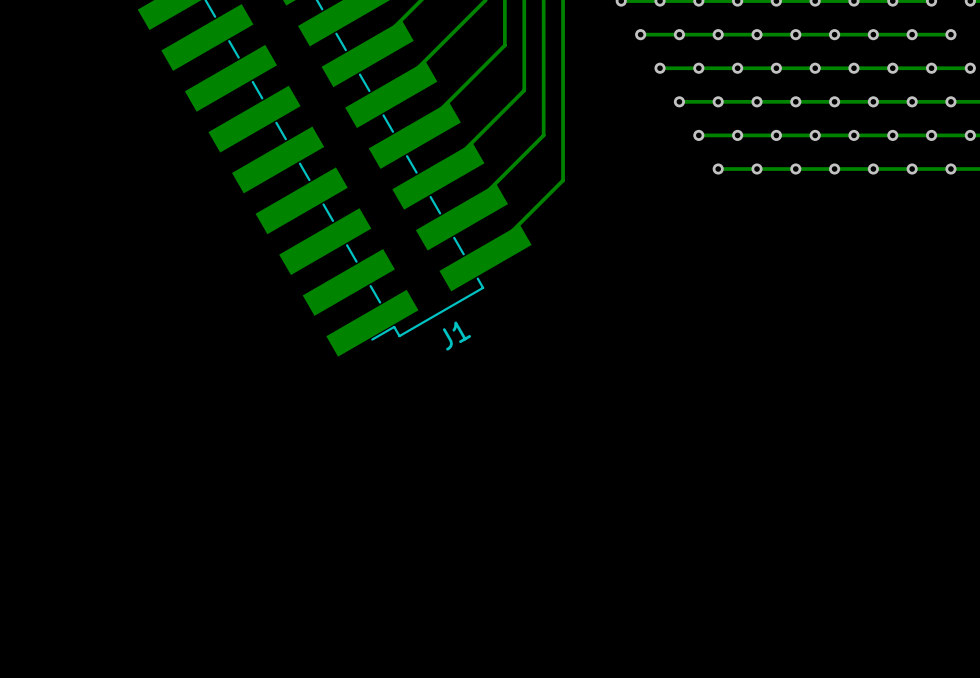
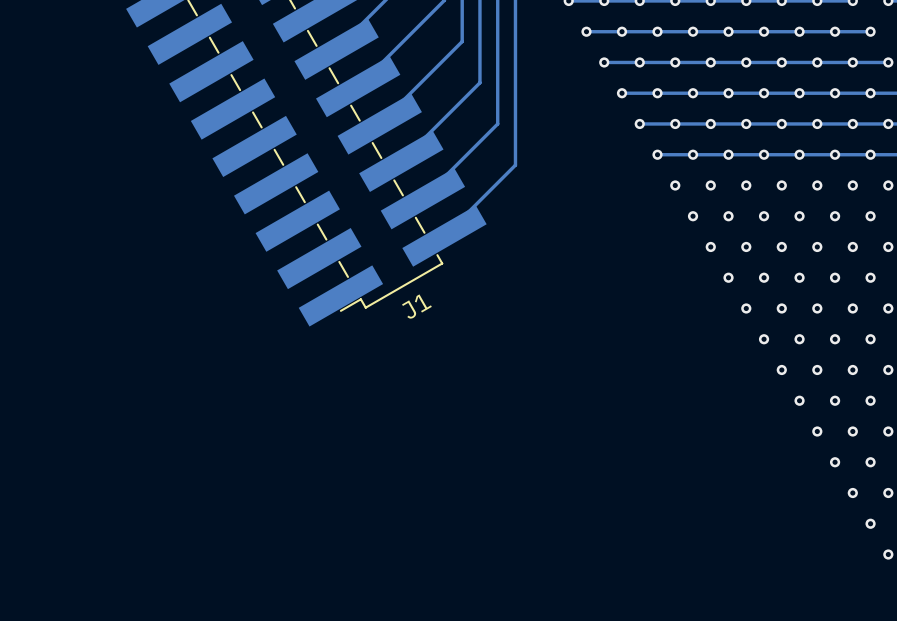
via: none -> (675, 185)
via: none -> (710, 185)
via: none -> (746, 185)
via: none -> (781, 185)
via: none -> (817, 185)
via: none -> (852, 185)
via: none -> (888, 185)
via: none -> (693, 216)
via: none -> (728, 216)
via: none -> (764, 216)
via: none -> (799, 216)
via: none -> (835, 216)
via: none -> (870, 216)
via: none -> (710, 246)
via: none -> (746, 246)
via: none -> (781, 246)
via: none -> (817, 246)
via: none -> (852, 246)
via: none -> (888, 246)
via: none -> (728, 277)
via: none -> (764, 277)
via: none -> (799, 277)
via: none -> (835, 277)
via: none -> (870, 277)
via: none -> (746, 308)
via: none -> (781, 308)
via: none -> (817, 308)
via: none -> (852, 308)
via: none -> (888, 308)
via: none -> (764, 339)
via: none -> (799, 339)
via: none -> (835, 339)
via: none -> (870, 339)
via: none -> (781, 369)
via: none -> (817, 369)
via: none -> (852, 369)
via: none -> (888, 369)
via: none -> (799, 400)
via: none -> (835, 400)
via: none -> (870, 400)
via: none -> (817, 431)
via: none -> (852, 431)
via: none -> (888, 431)
via: none -> (835, 462)
via: none -> (870, 462)
via: none -> (852, 493)
via: none -> (888, 493)
via: none -> (870, 523)
via: none -> (888, 554)

